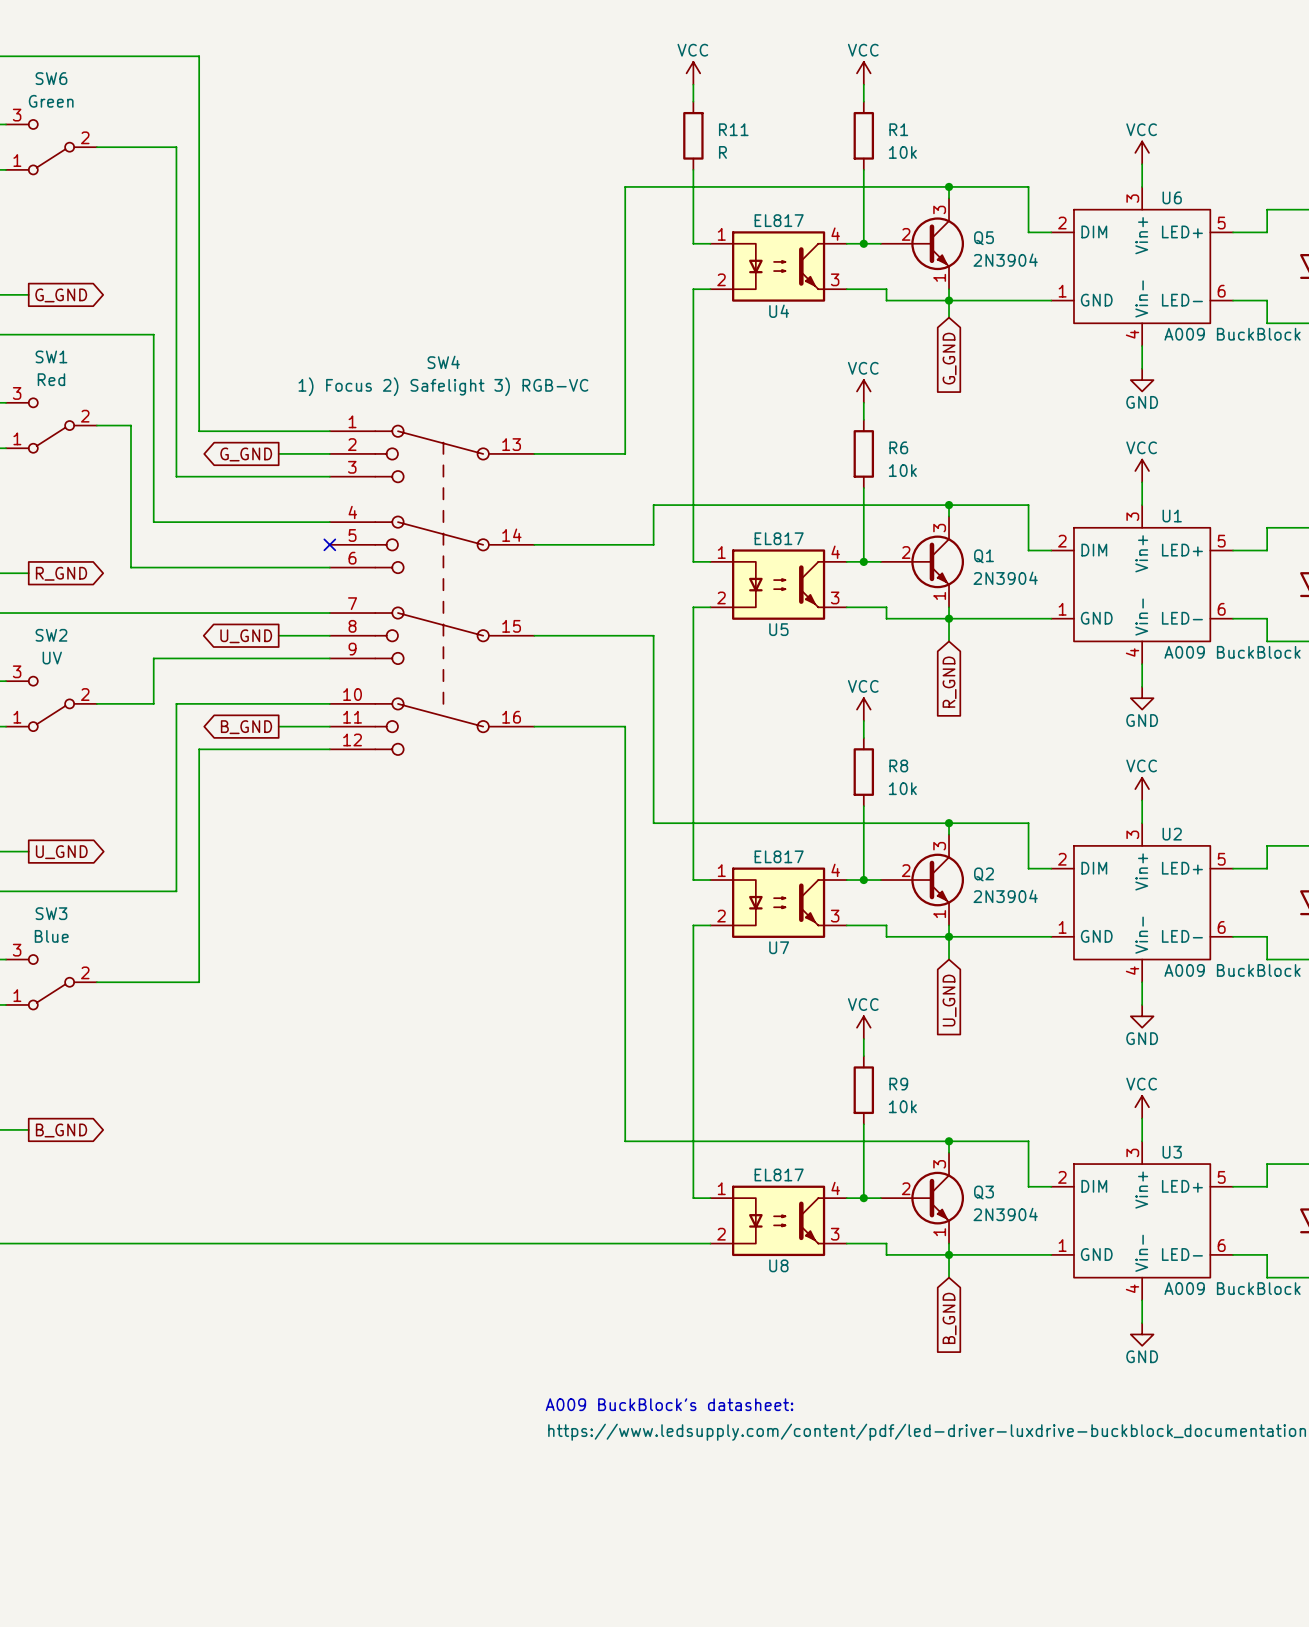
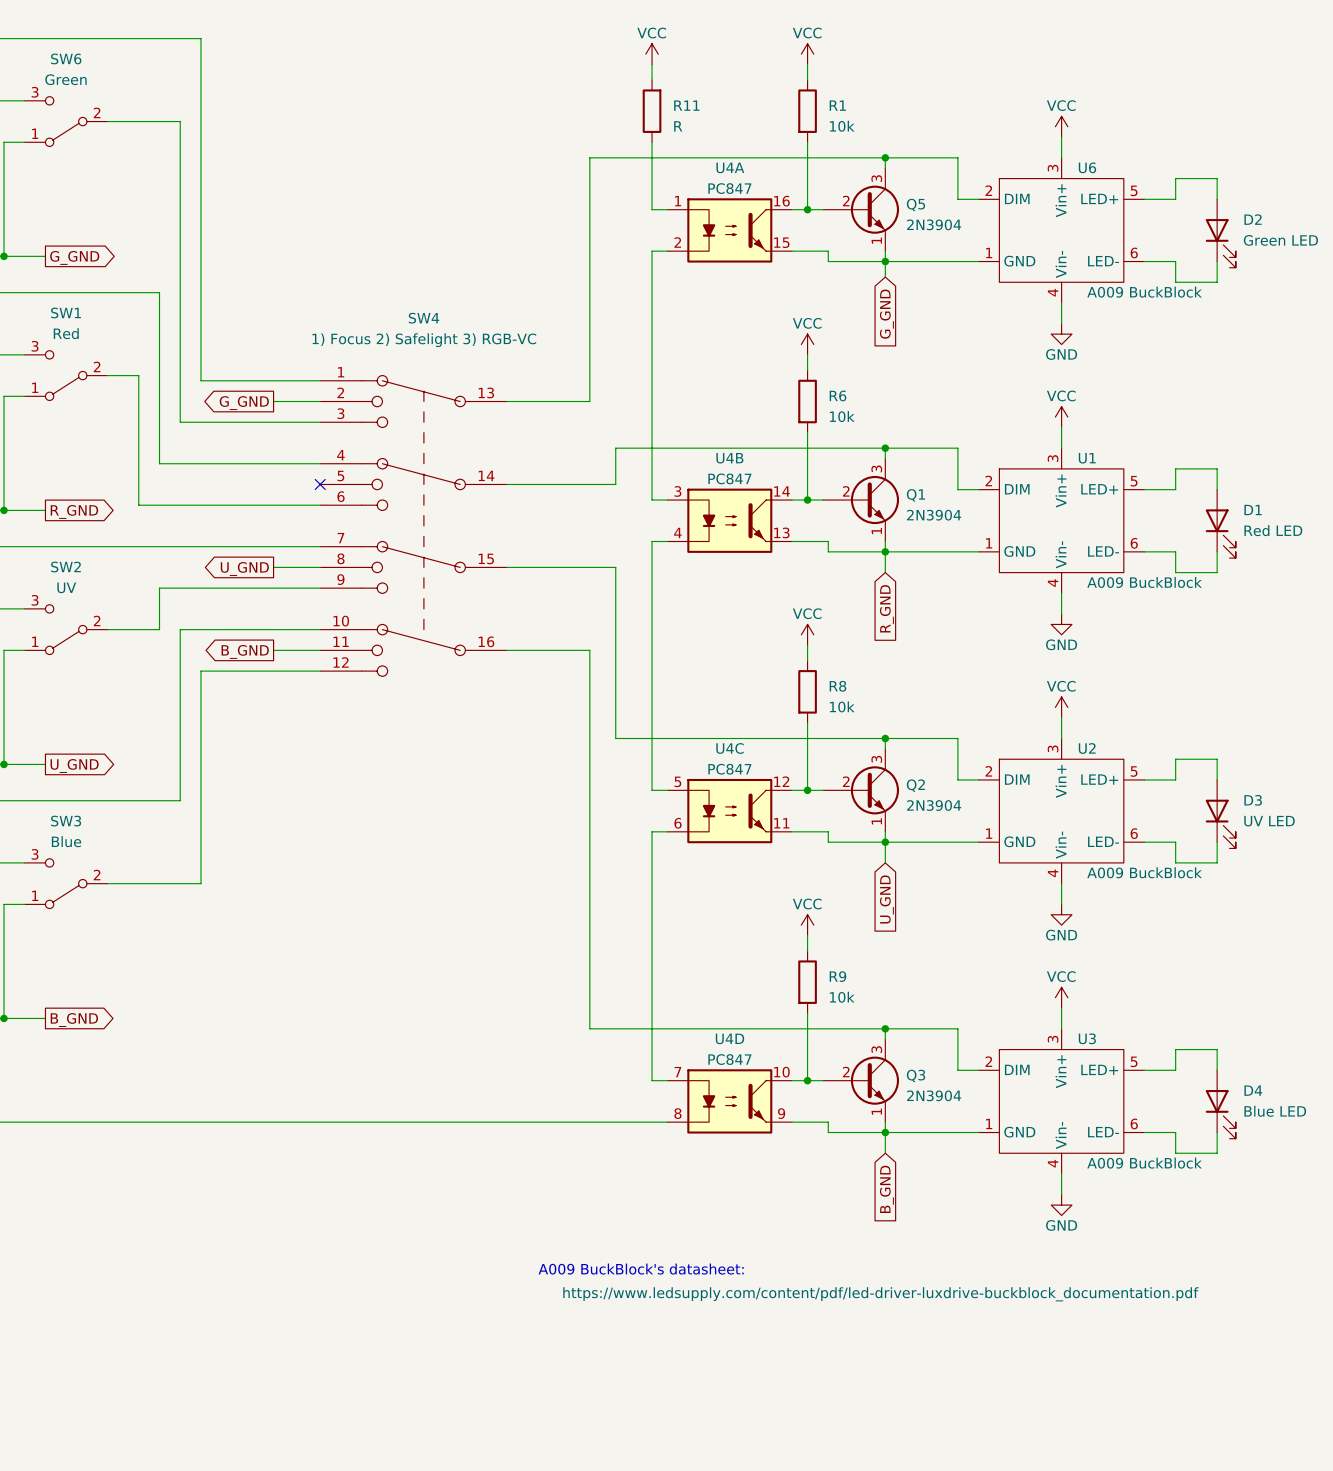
U4: EL817 (778, 266) -> none
U4A: none -> PC847 (729, 230)
U5: EL817 (778, 584) -> none
U4B: none -> PC847 (729, 520)
U7: EL817 (778, 902) -> none
U4C: none -> PC847 (729, 811)
U8: EL817 (778, 1220) -> none
U4D: none -> PC847 (729, 1101)

